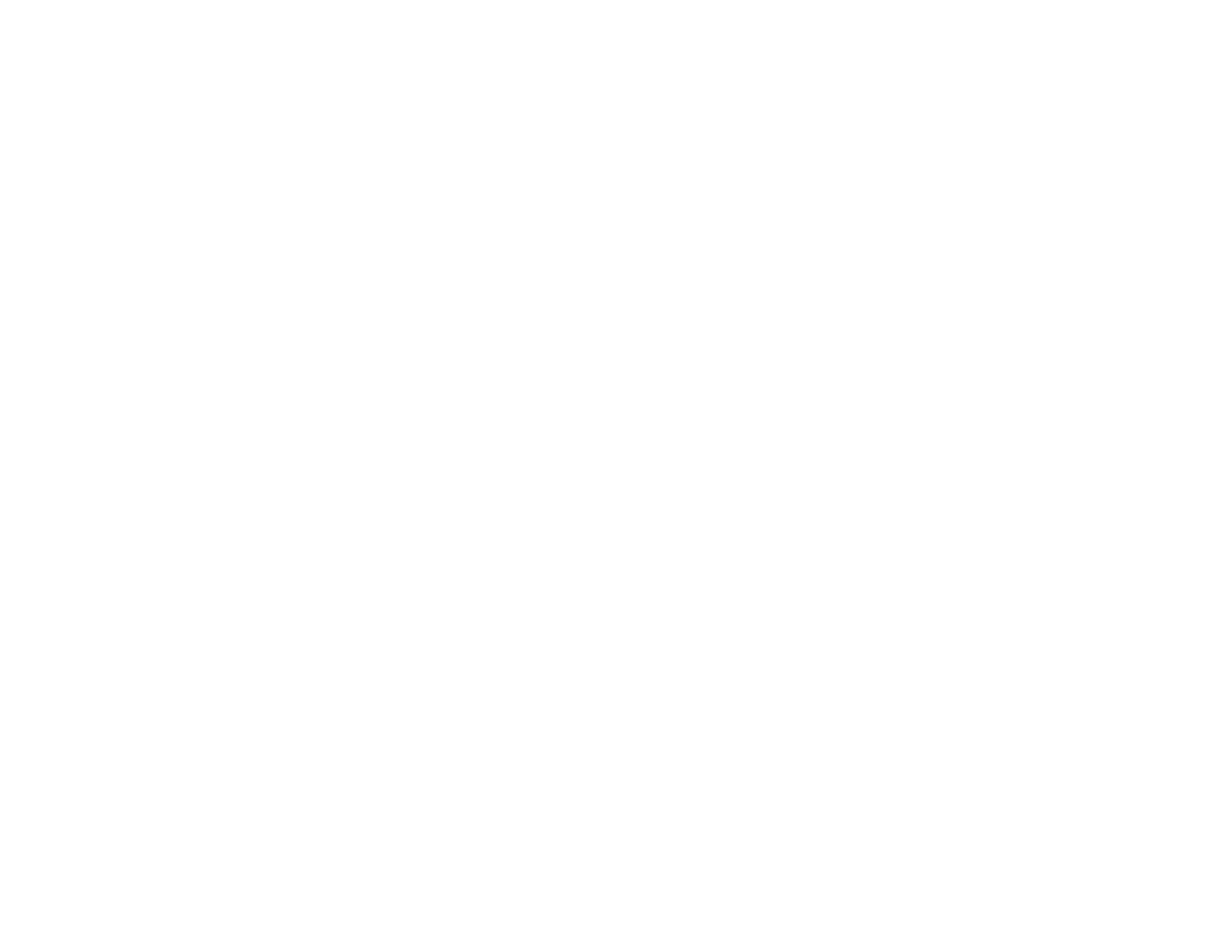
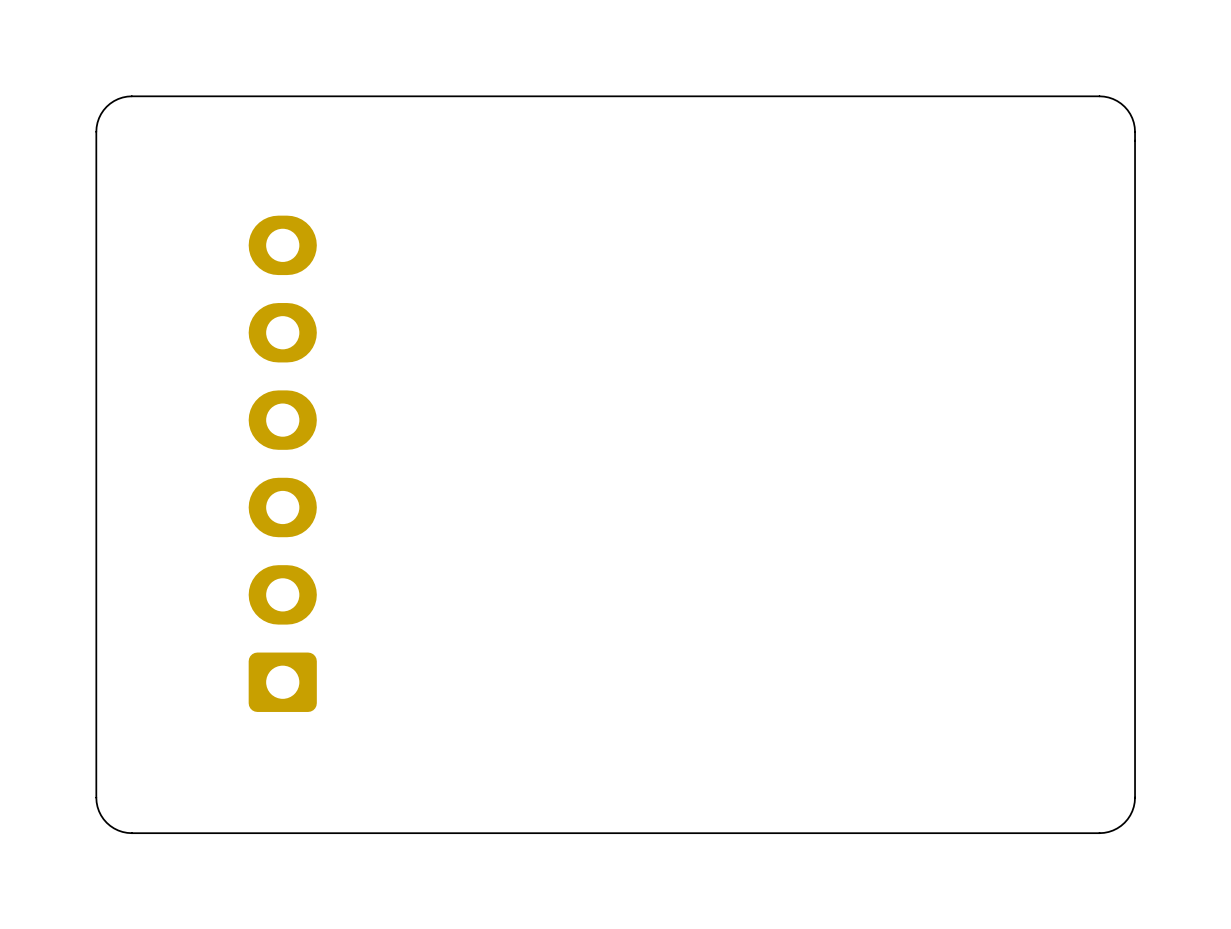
board edge: none -> (1099, 96) (131, 96) (118, 99) (110, 103) (99, 118) (96, 131) (96, 797) (97, 806) (103, 819) (118, 830) (131, 833) (1099, 833) (1108, 831) (1121, 825) (1132, 811) (1135, 797) (1135, 131) (1132, 118) (1124, 106) (1113, 99) (1099, 96)
part: none -> (282, 463)

